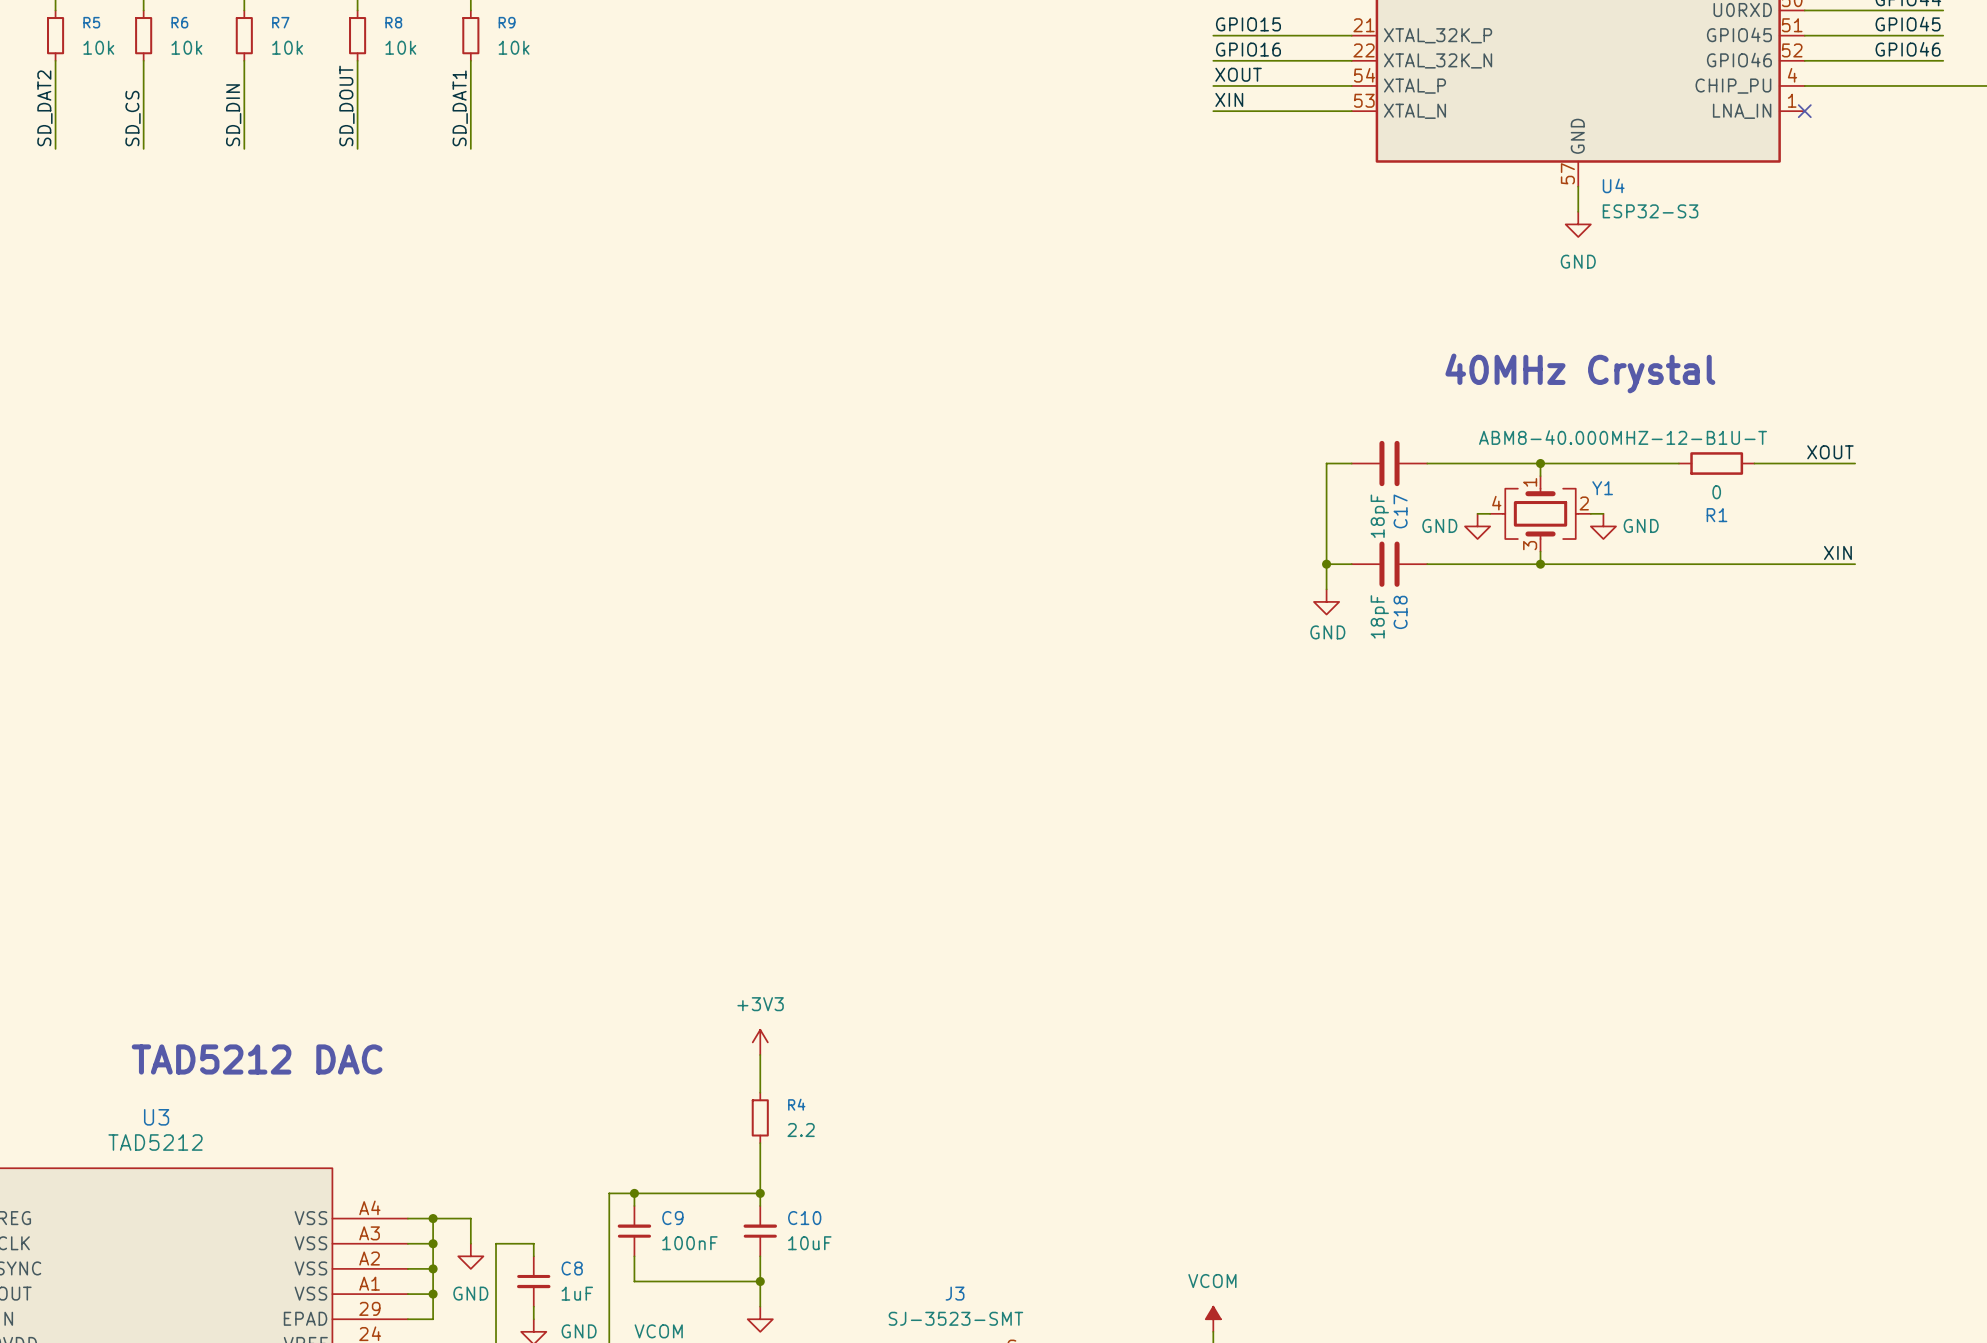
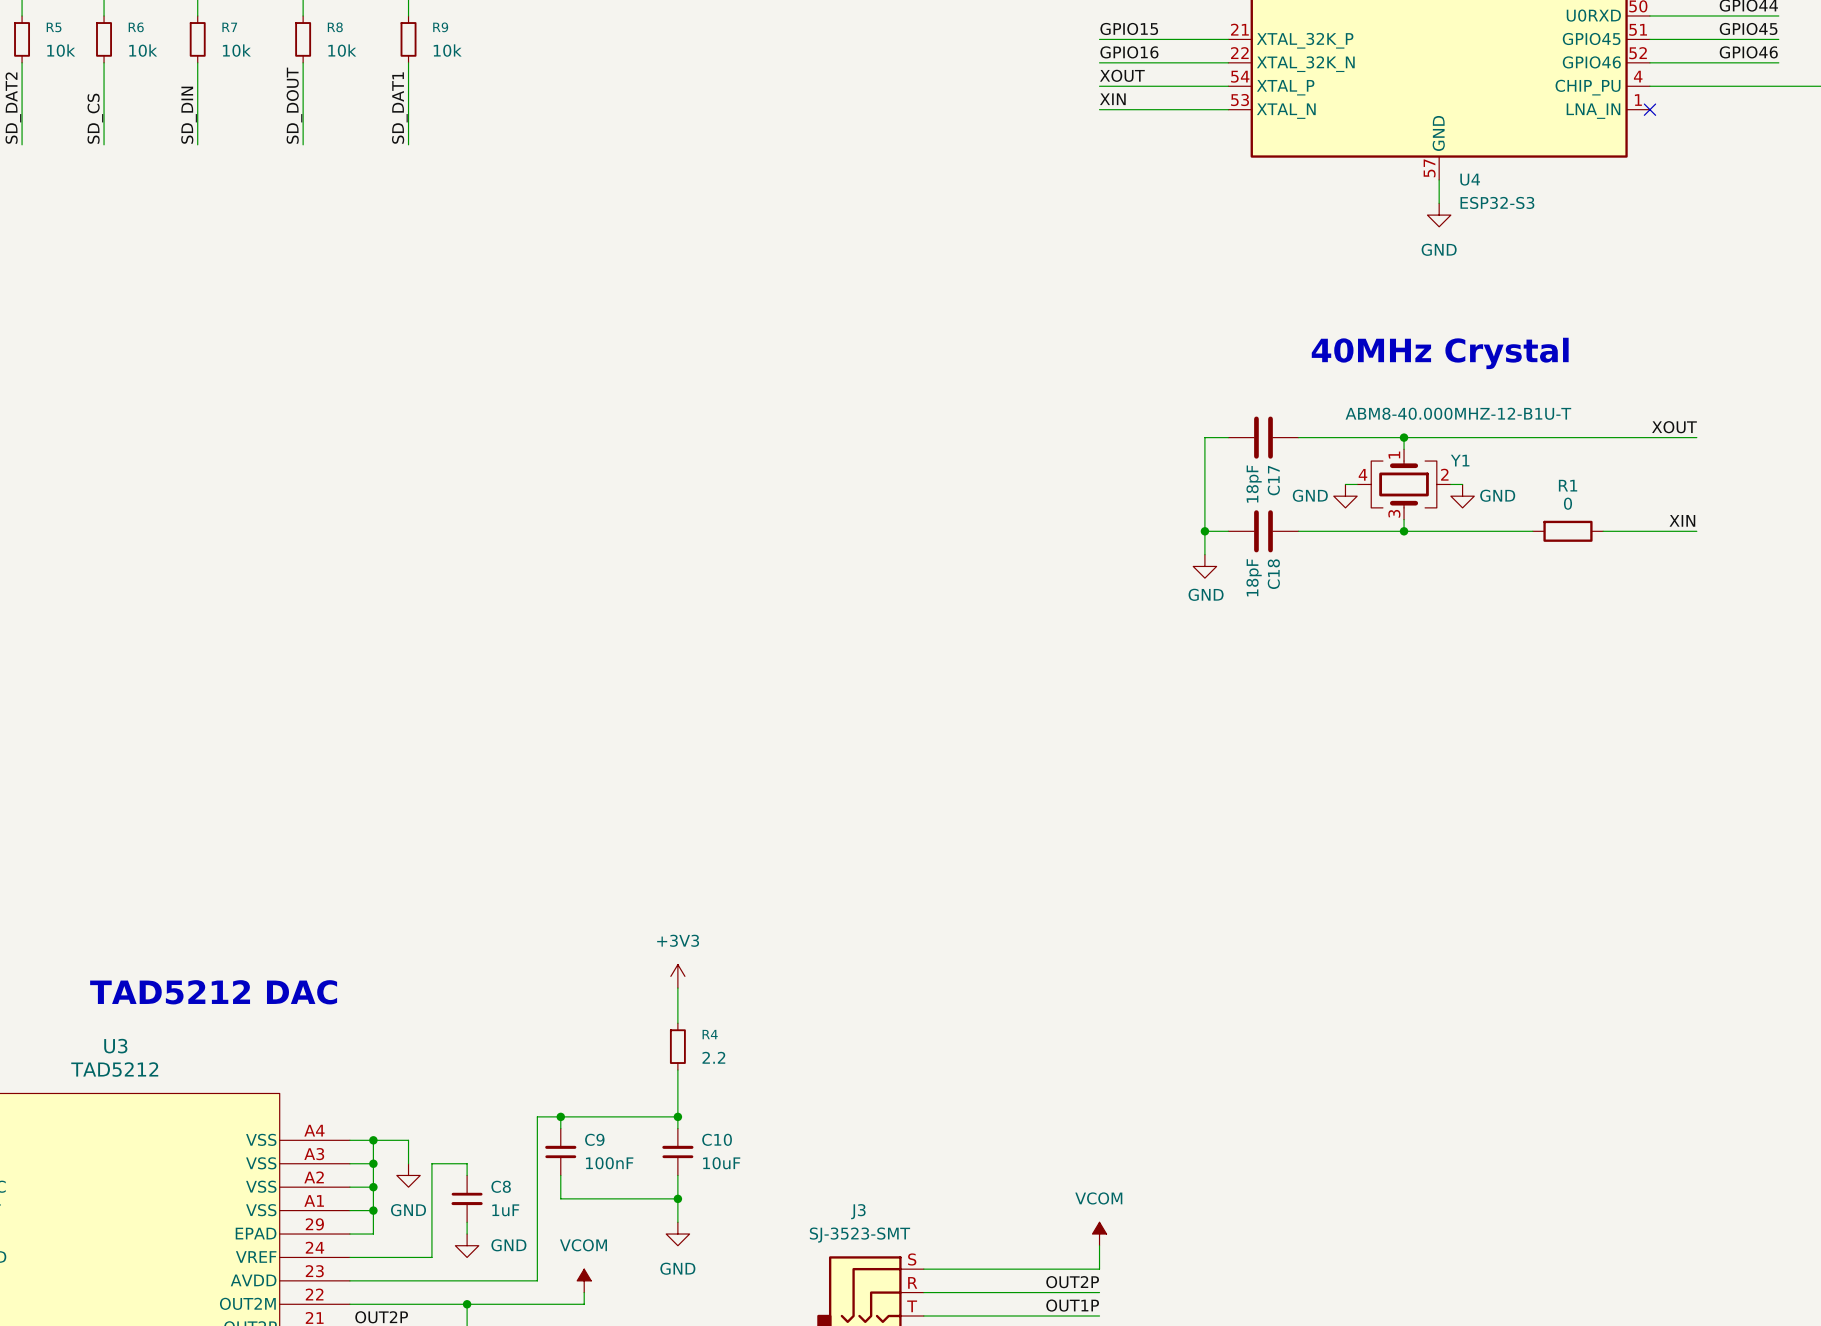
R1 position: (1716, 463) -> (1567, 531)
R1 value position: 0 (1716, 492) -> 0 (1567, 503)
wire: (1678, 564) (1754, 564) -> (1532, 437) (1603, 437)

